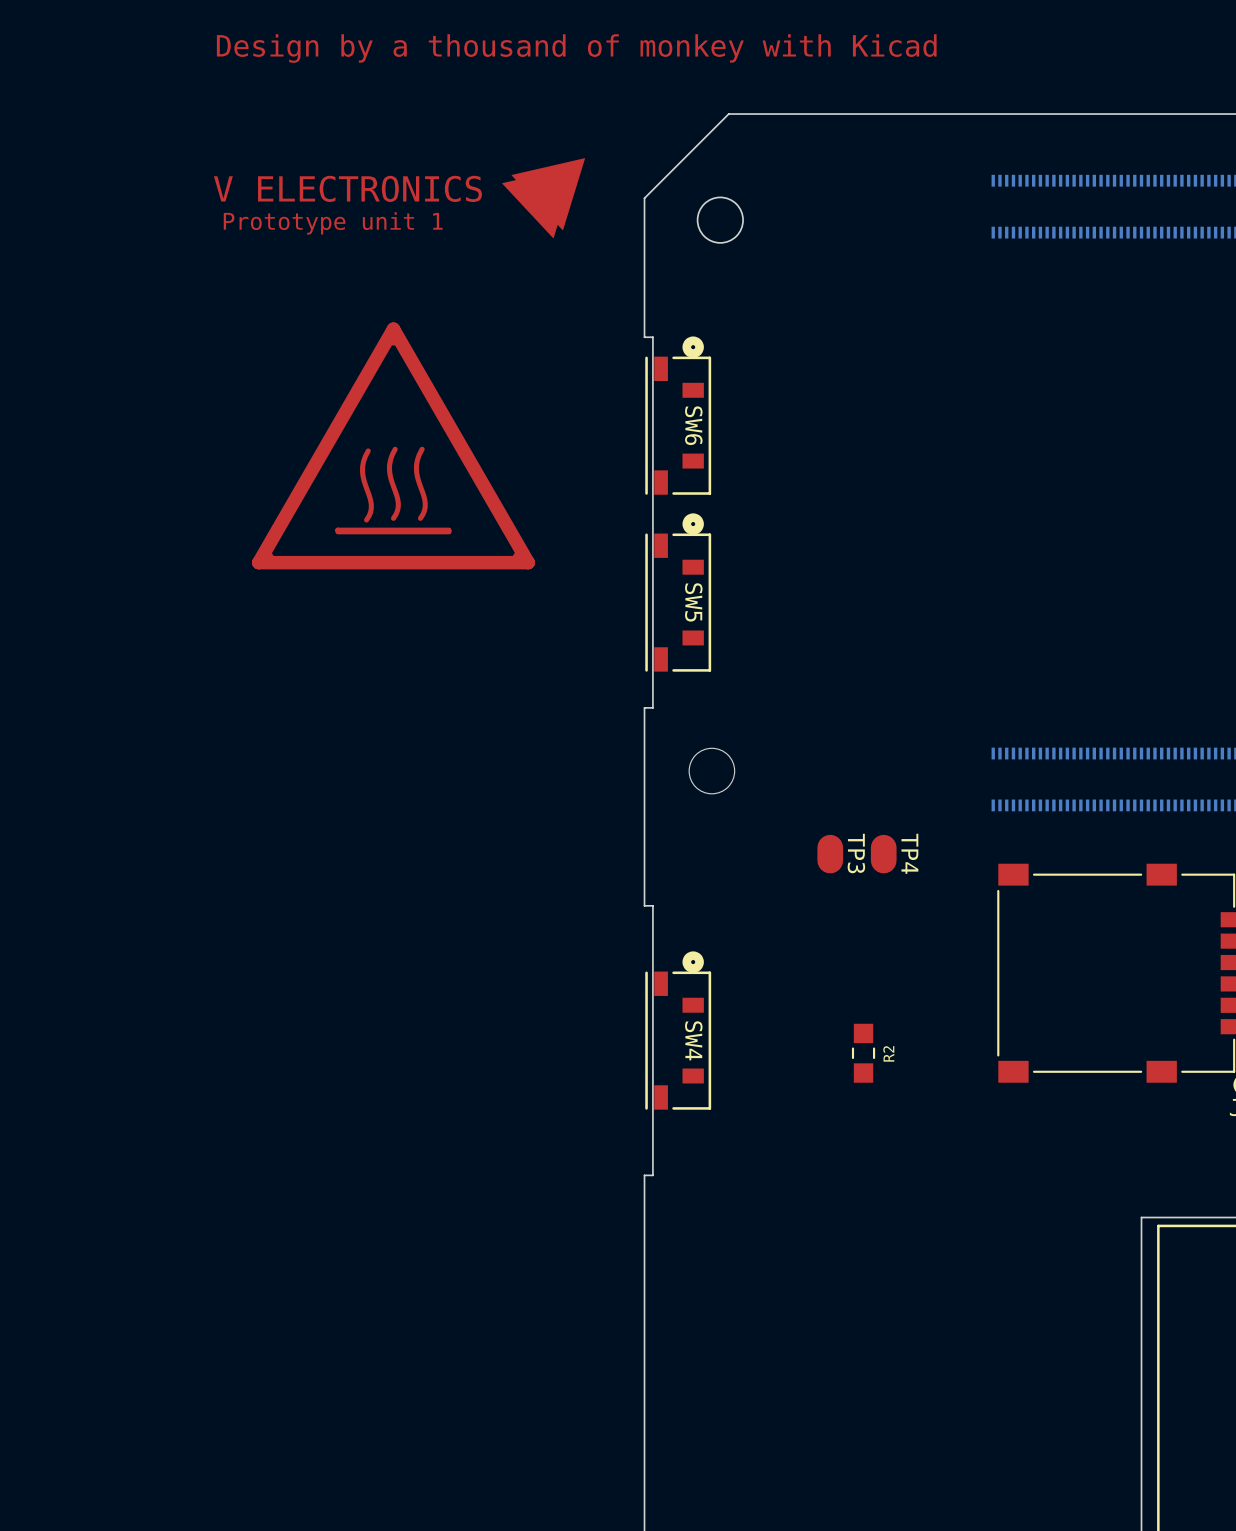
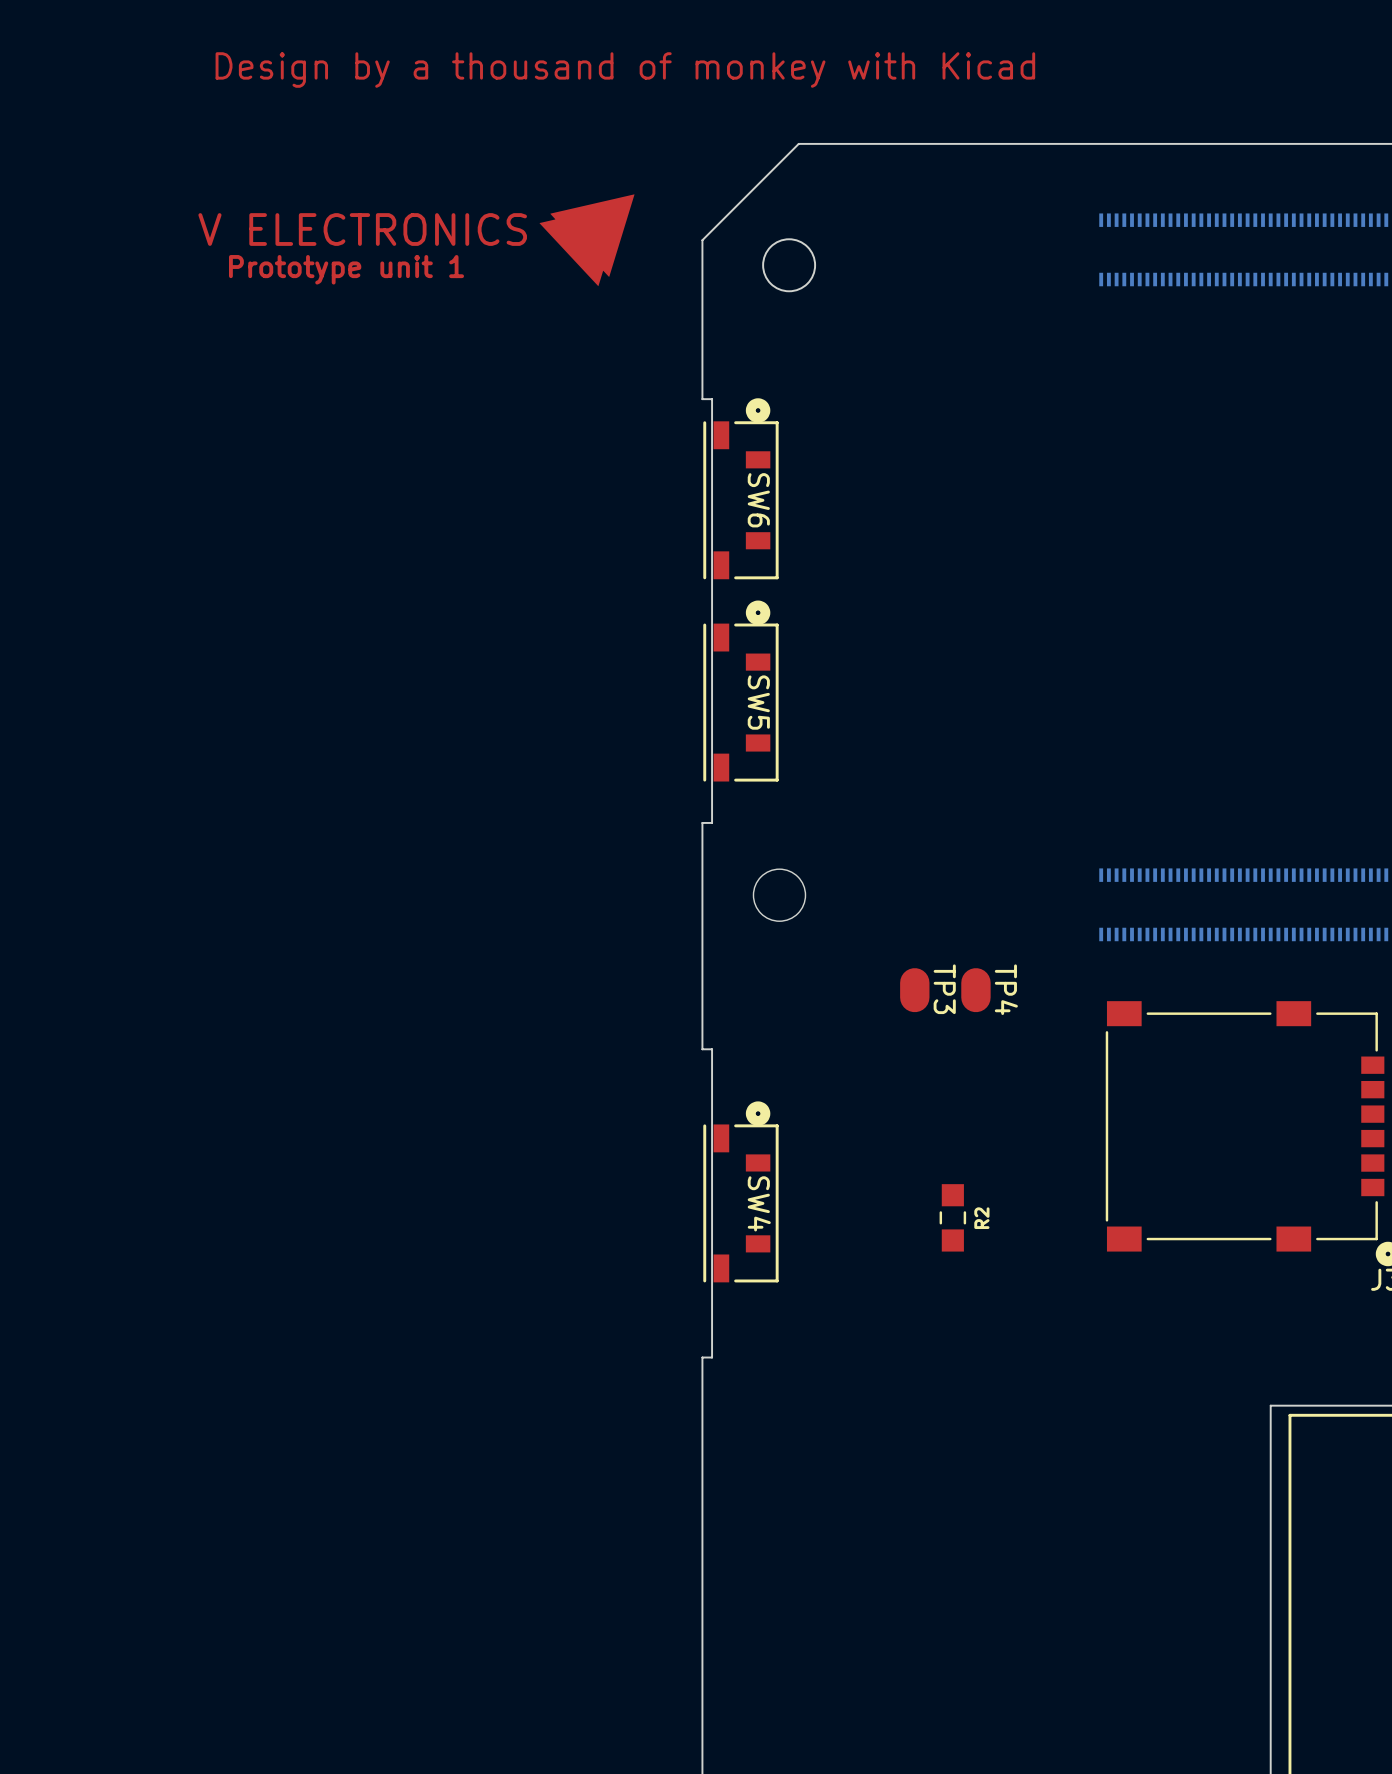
drawing: [251, 322, 536, 570] -> none

